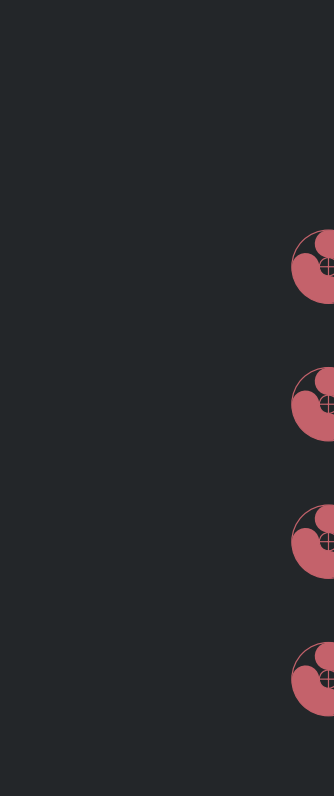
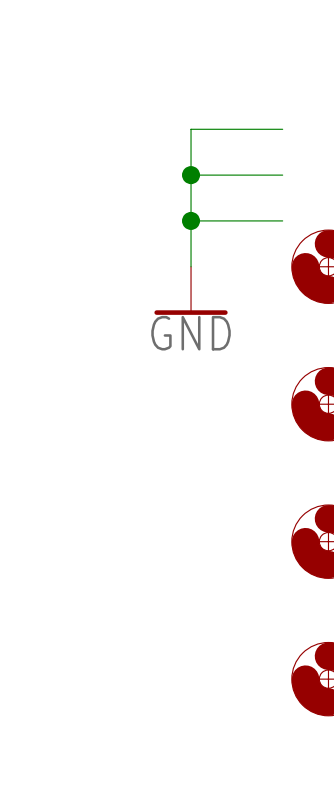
wire: none -> (282, 129) (191, 129) (191, 266)
wire: none -> (191, 175) (282, 175)
junction: none -> (191, 175)
wire: none -> (191, 220) (282, 220)
junction: none -> (191, 220)
power symbol: none -> GND (191, 290)

